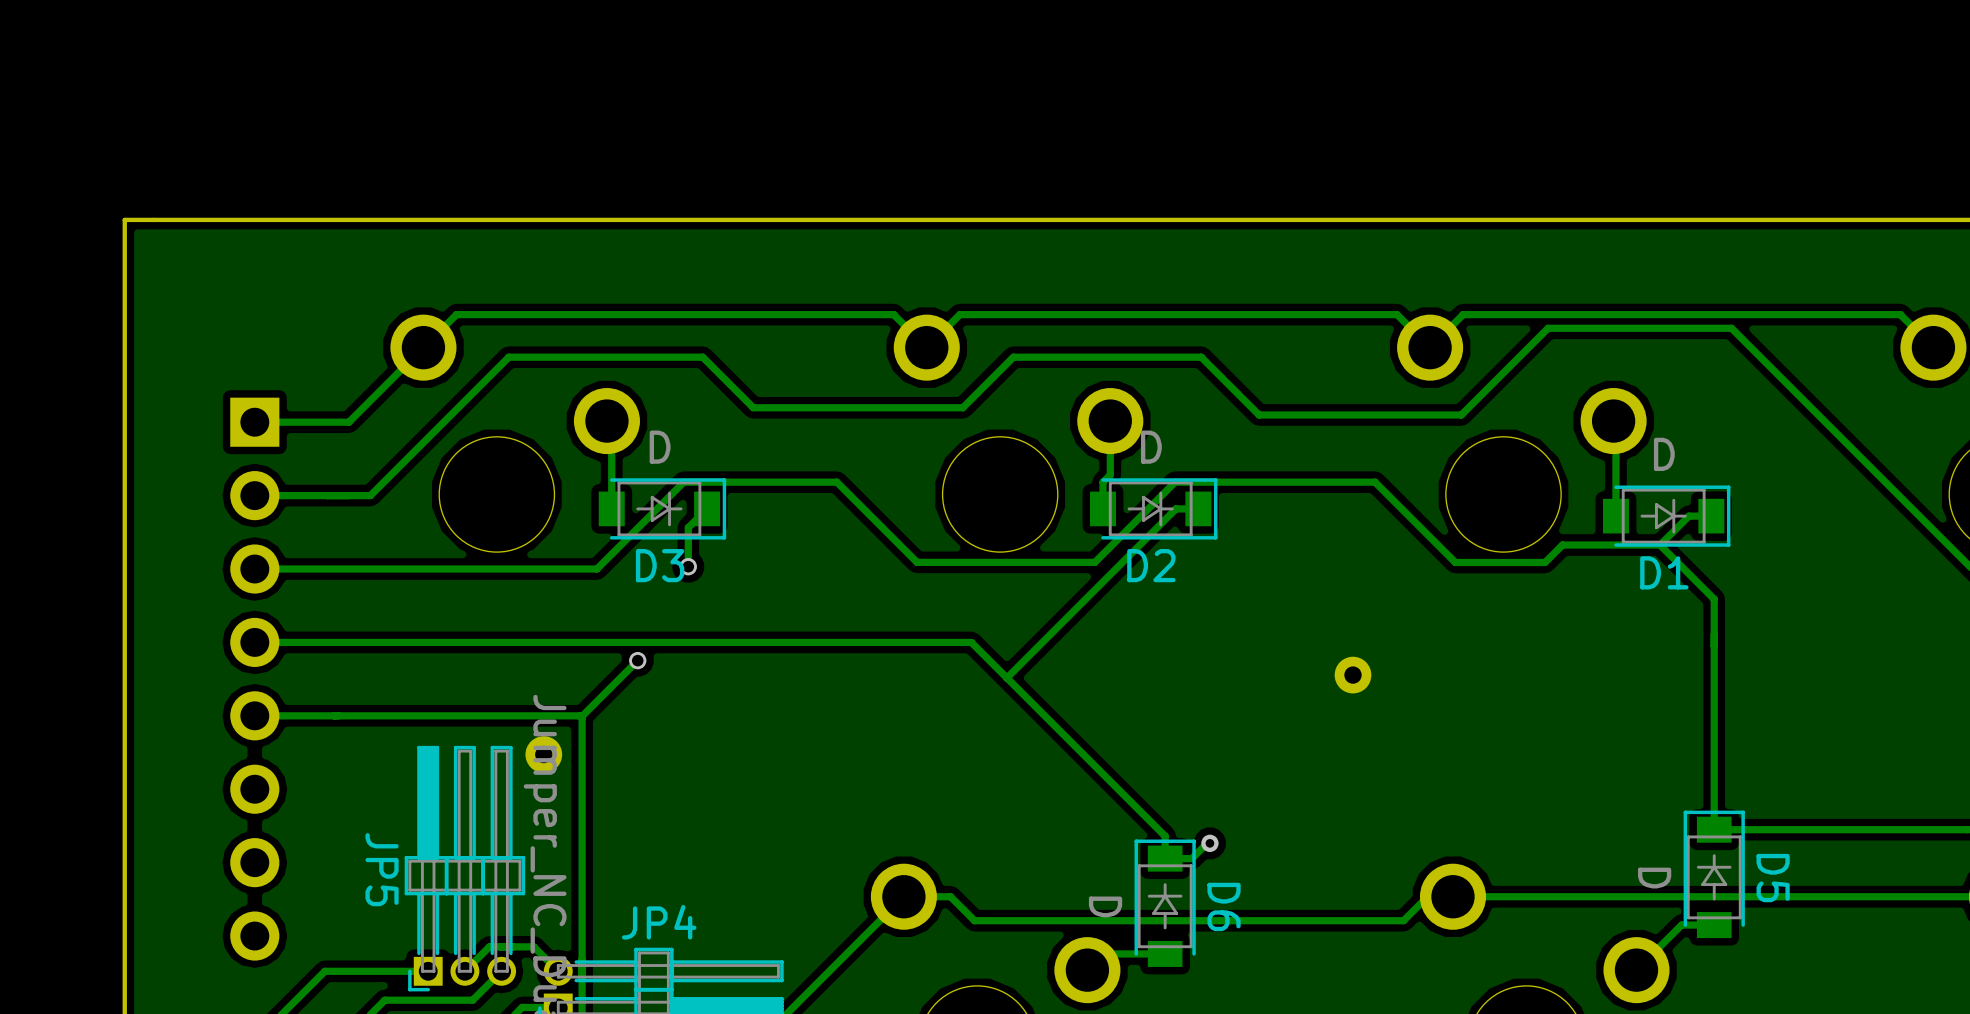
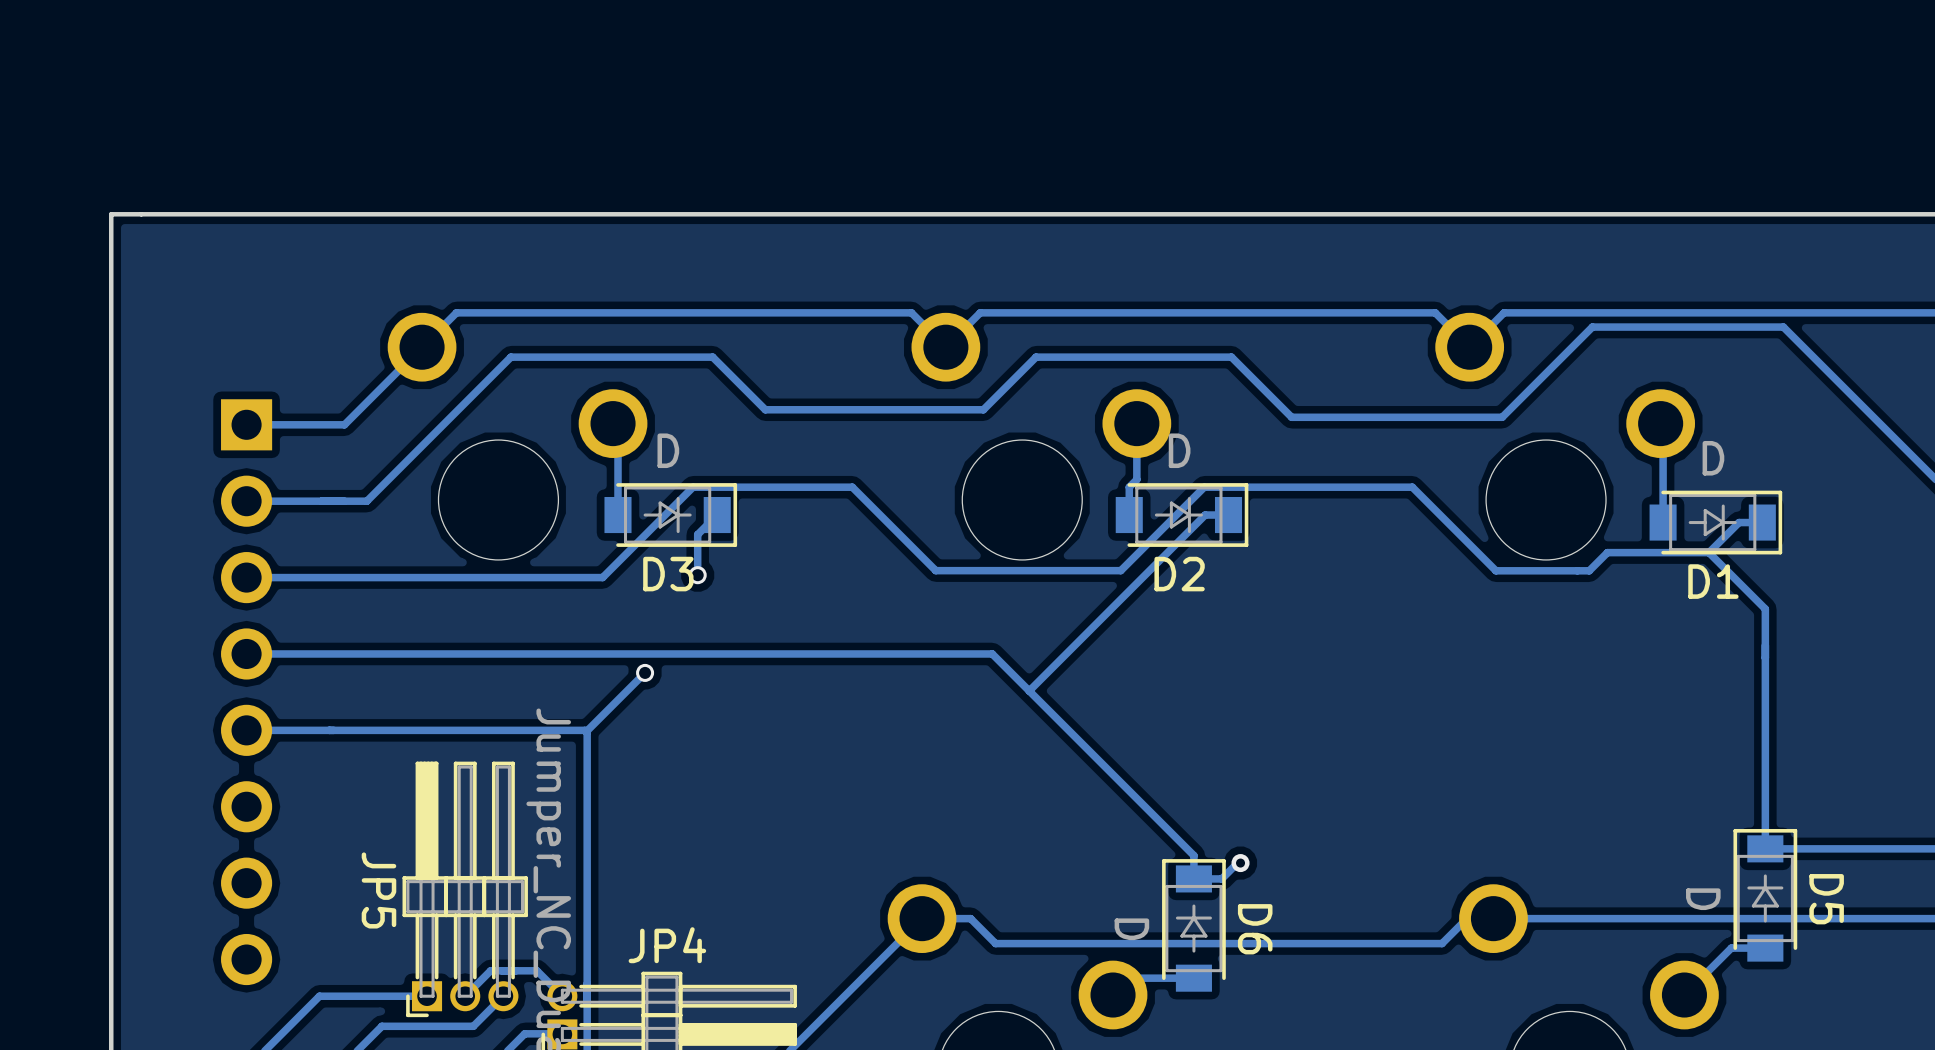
part: (1352, 675) -> none
part: (543, 754) -> none

